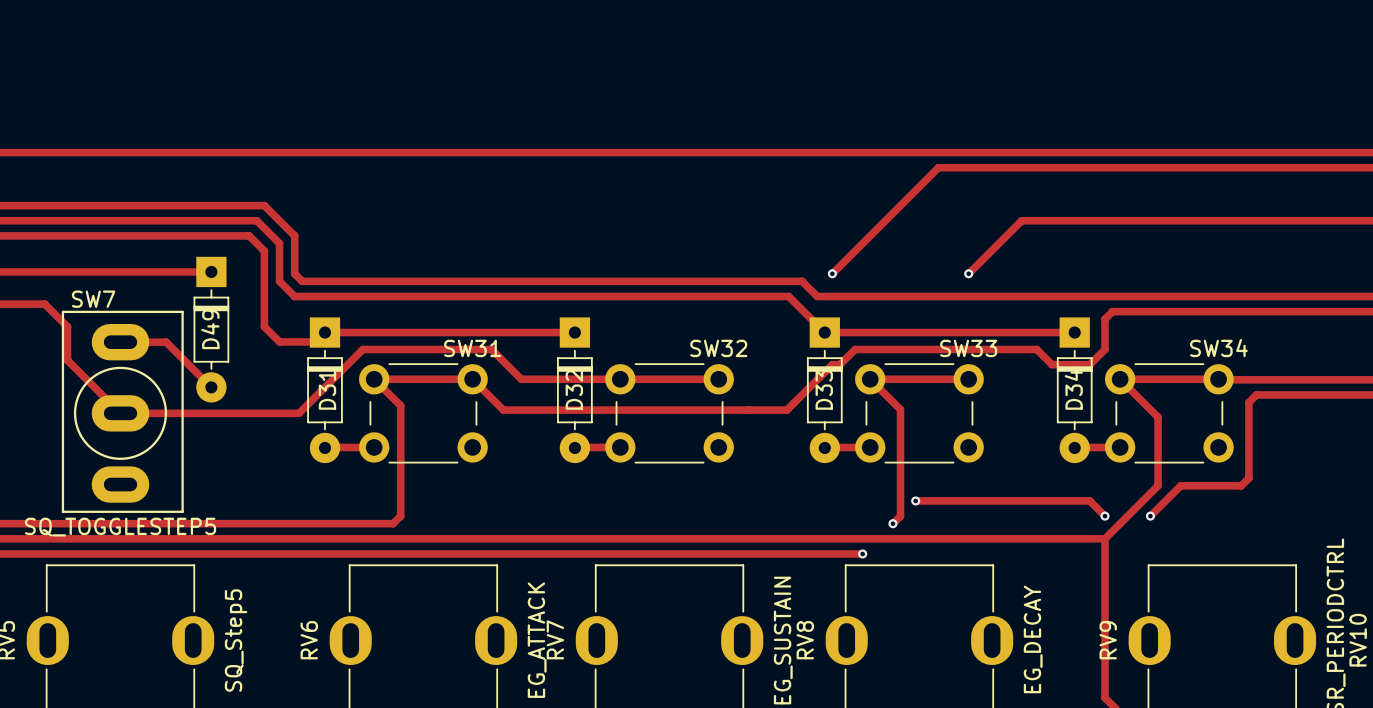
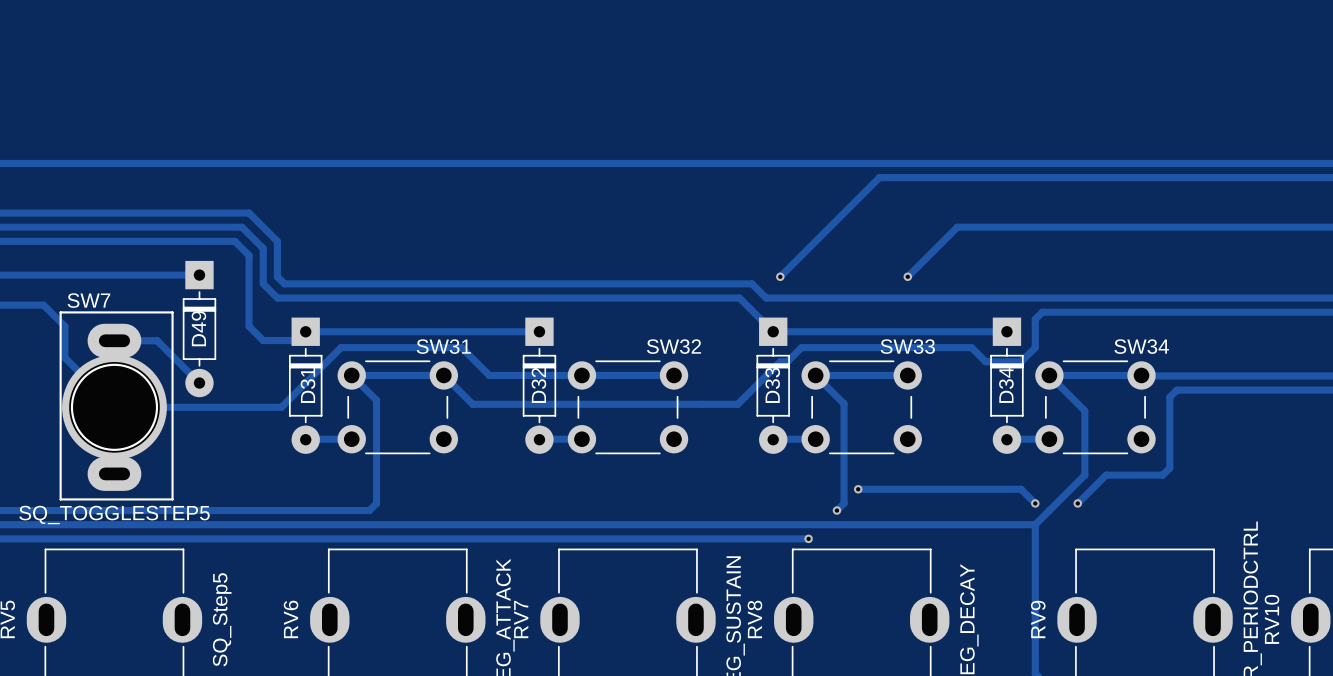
part: none -> (114, 407)

